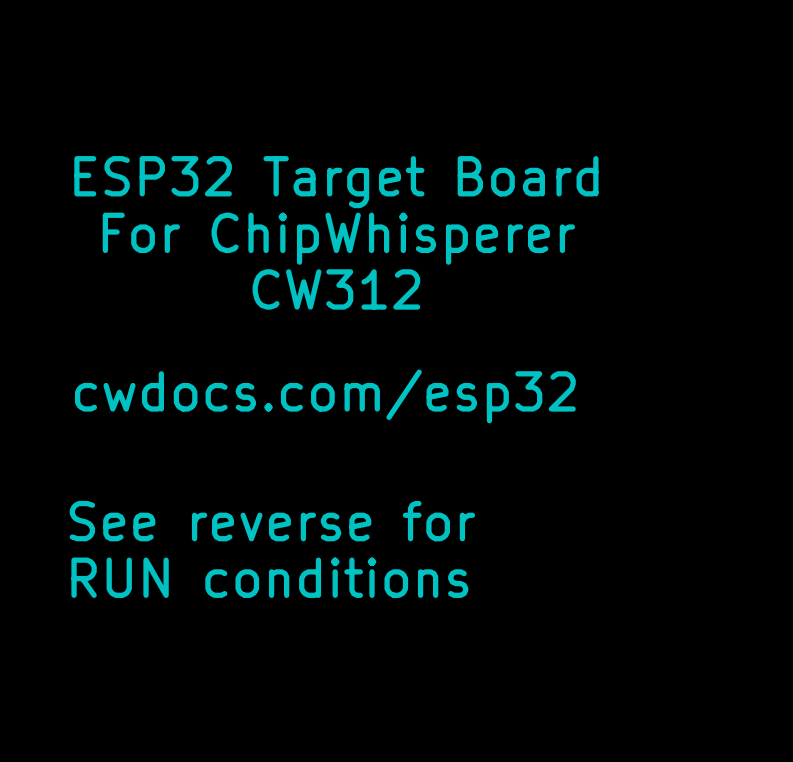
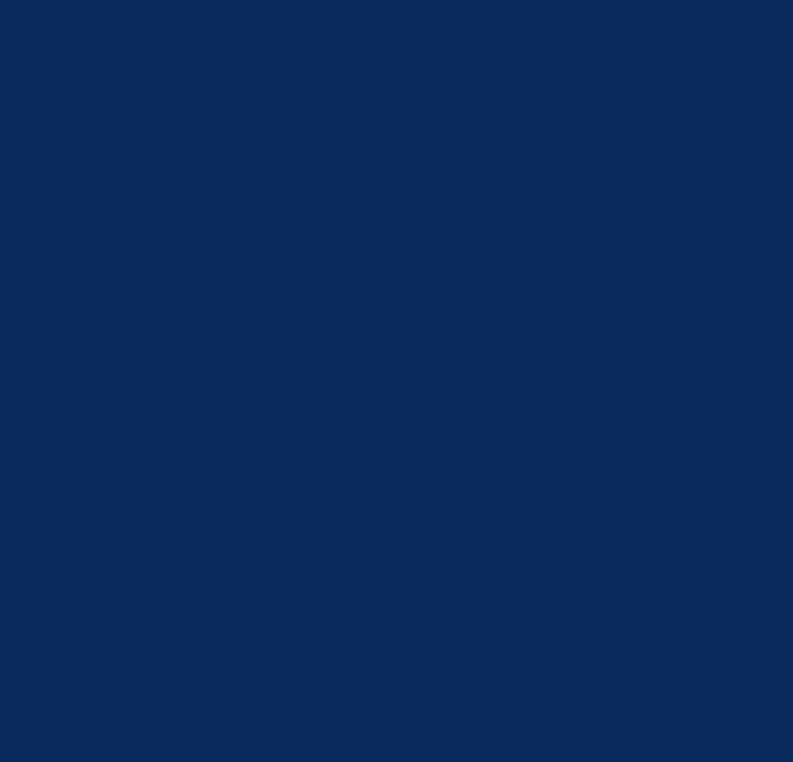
text: ESP32 Target Board (336, 182) -> none
text: For ChipWhisperer (338, 238) -> none
text: CW312 (336, 289) -> none
text: cwdocs.com/esp32 (325, 396) -> none
text: See reverse for (272, 521) -> none
text: RUN conditions (269, 577) -> none

